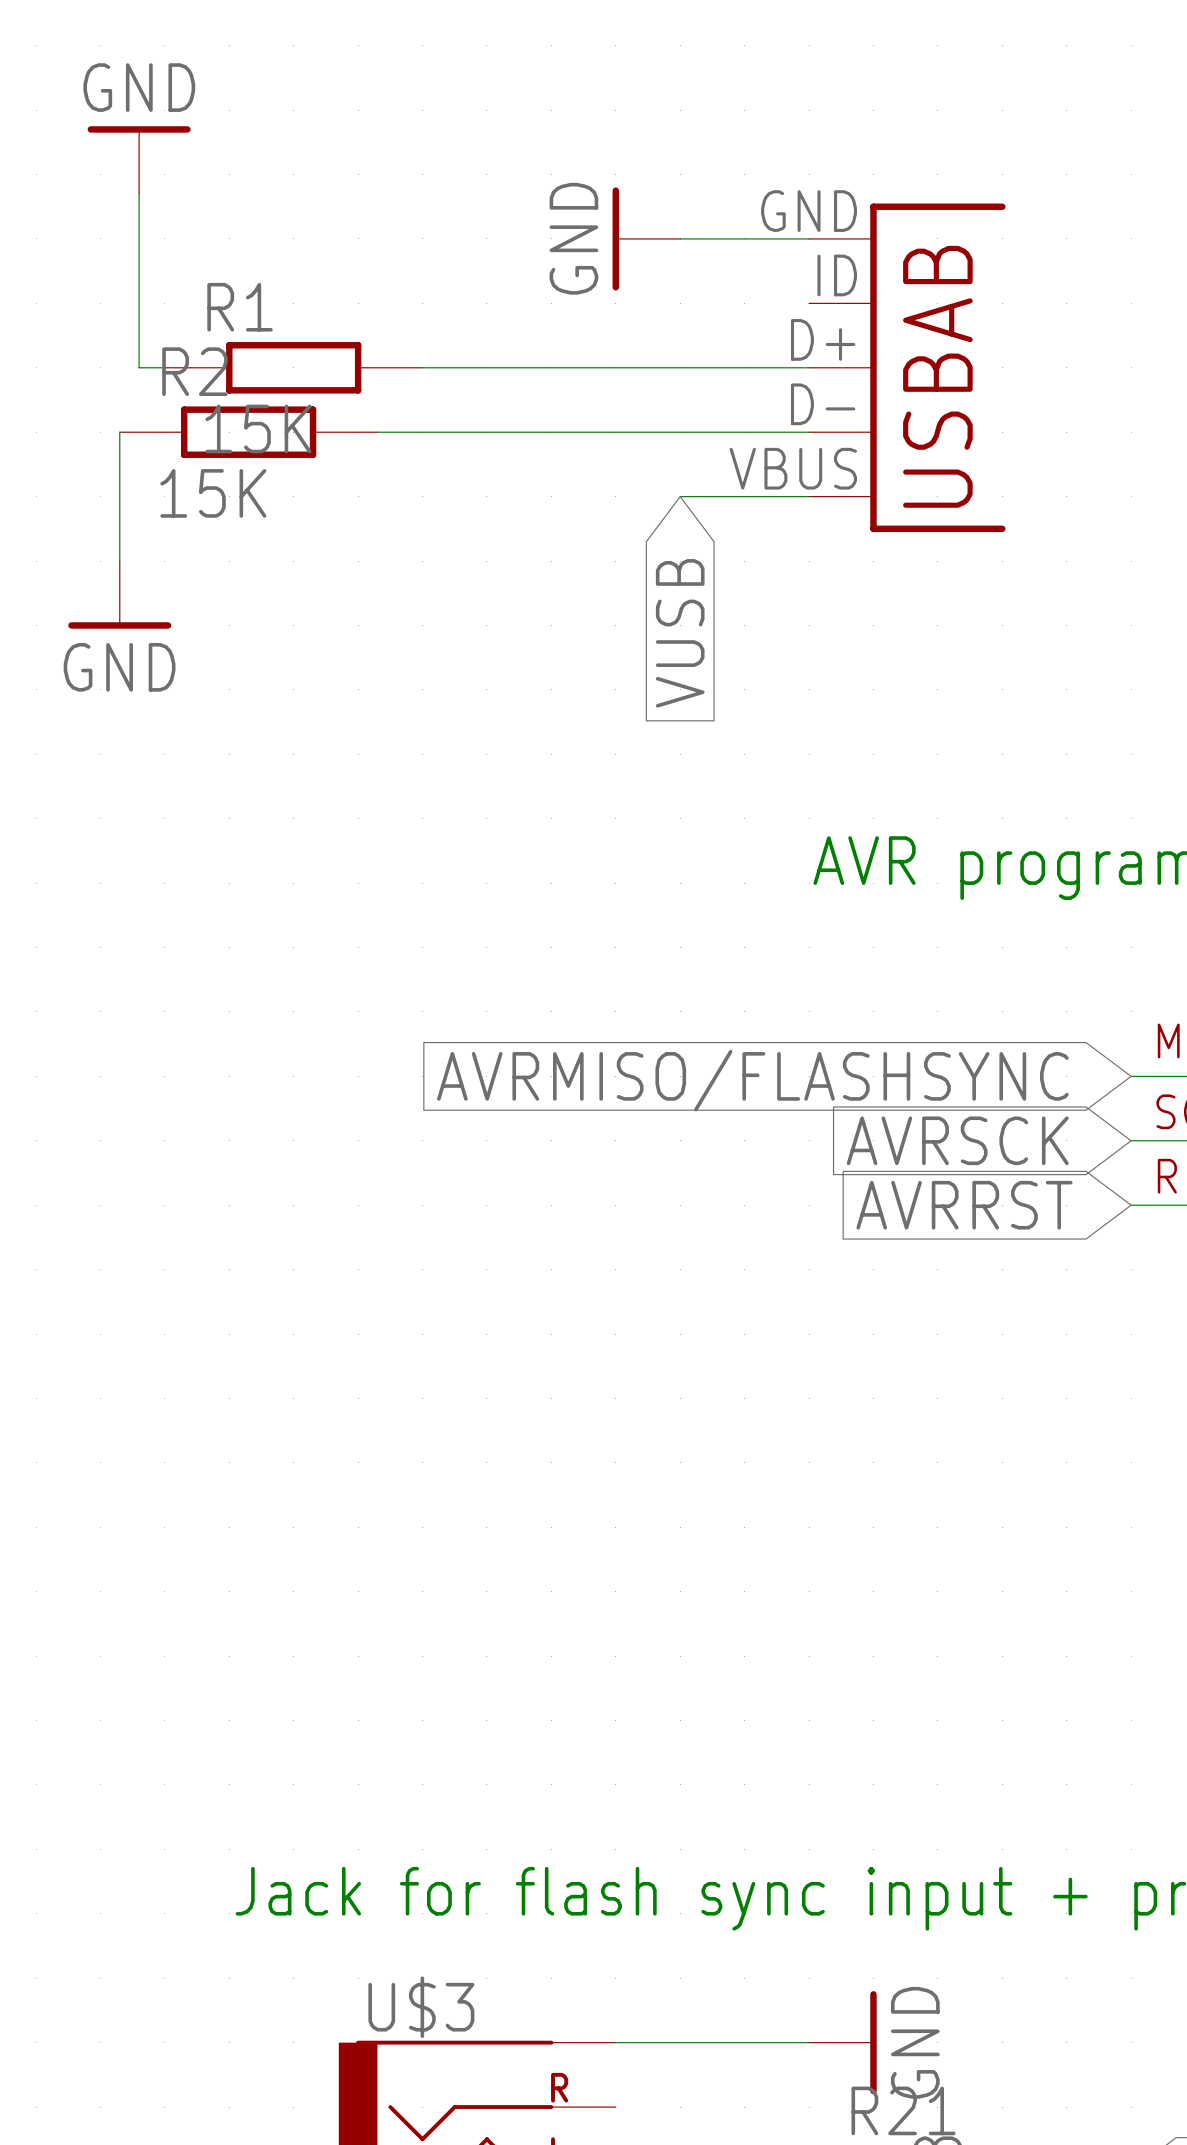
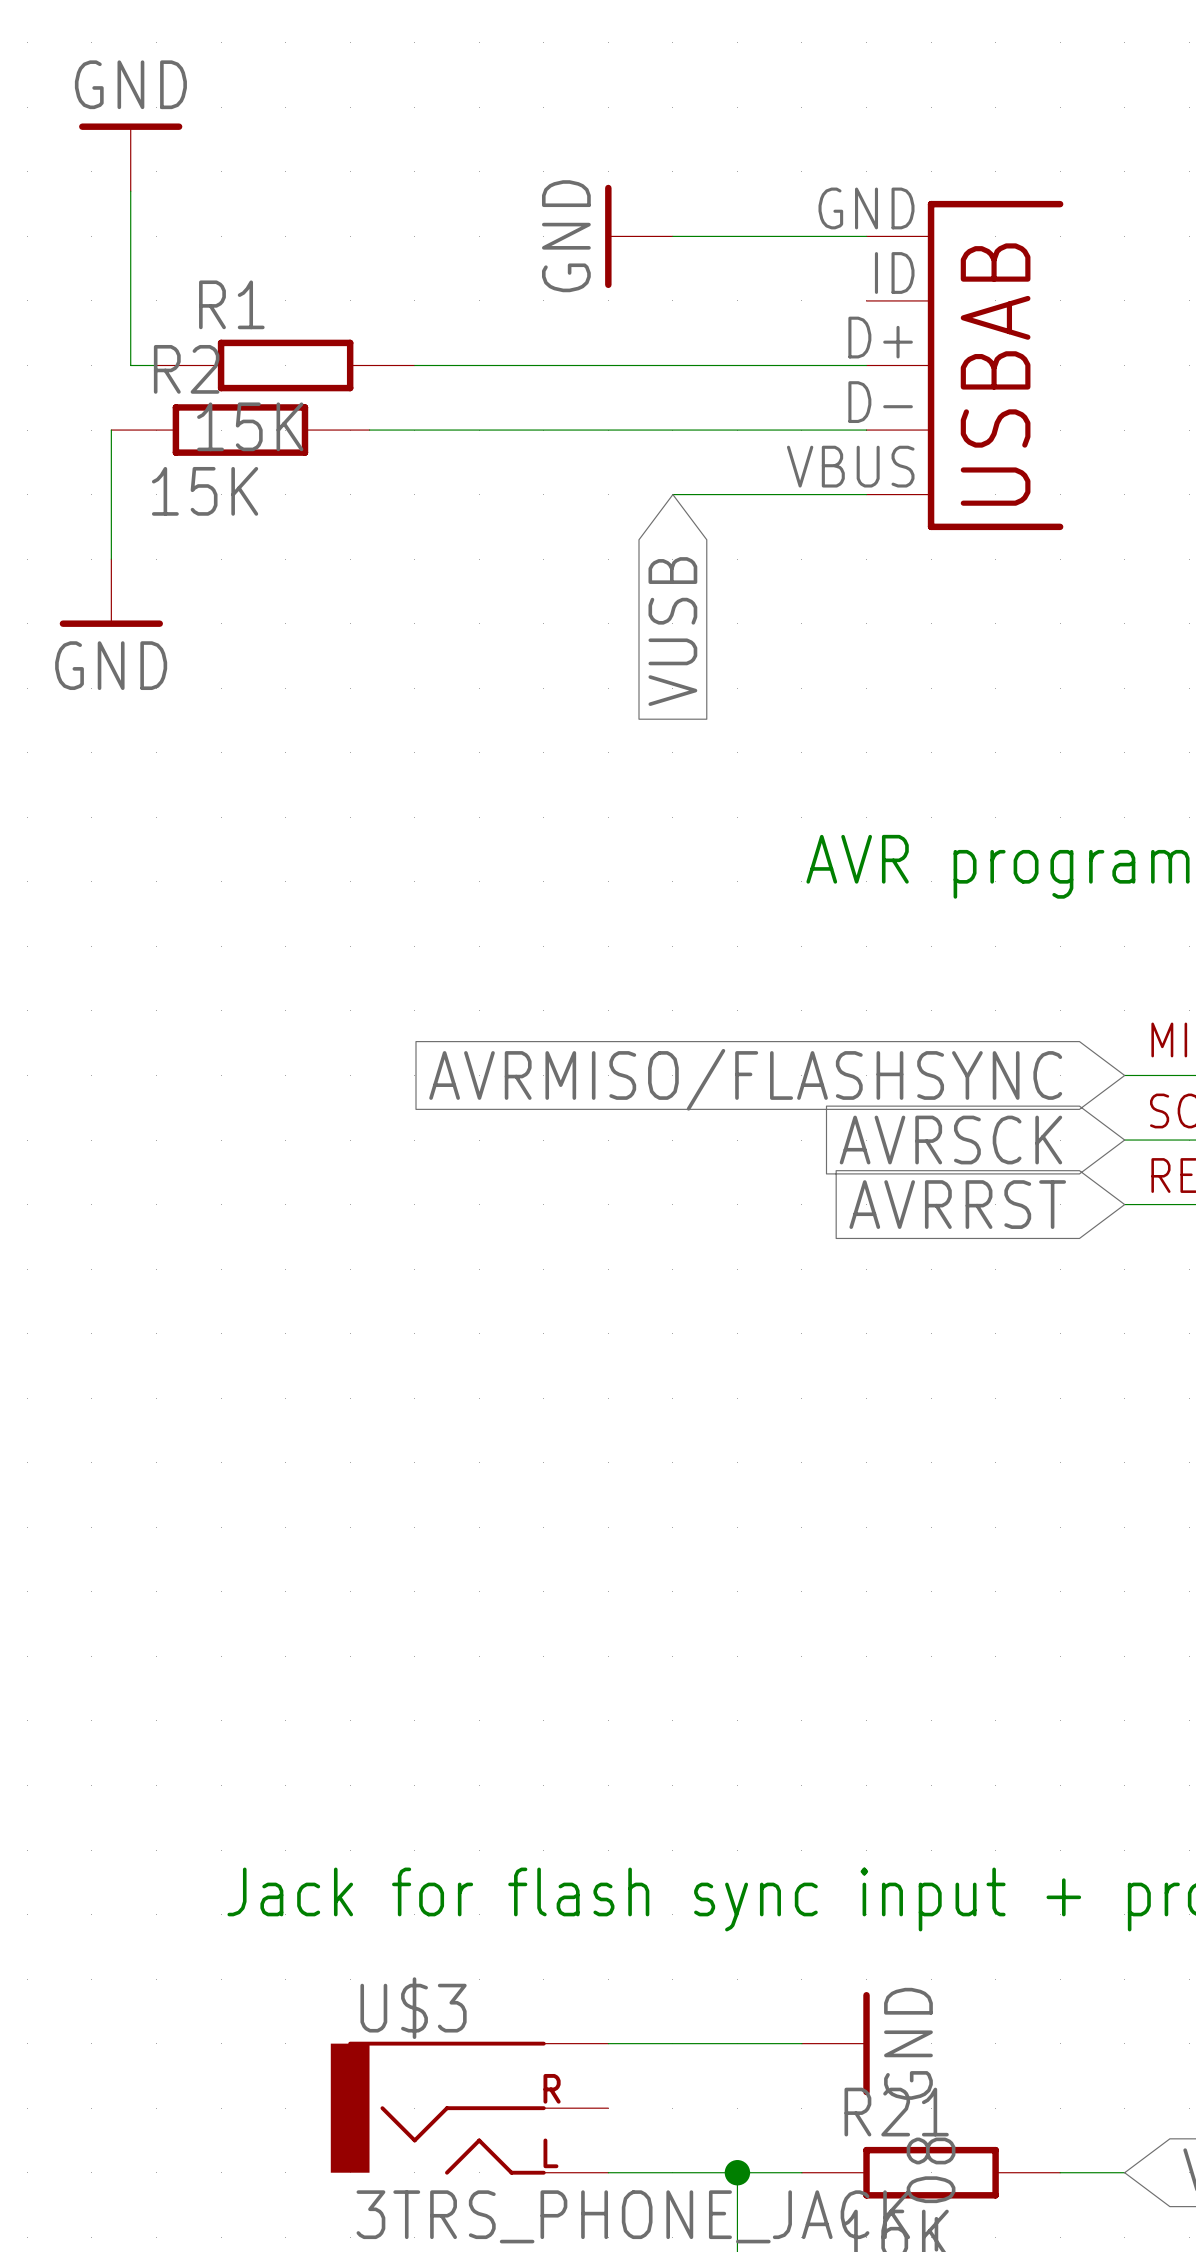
part position: (907, 367) -> (964, 365)

